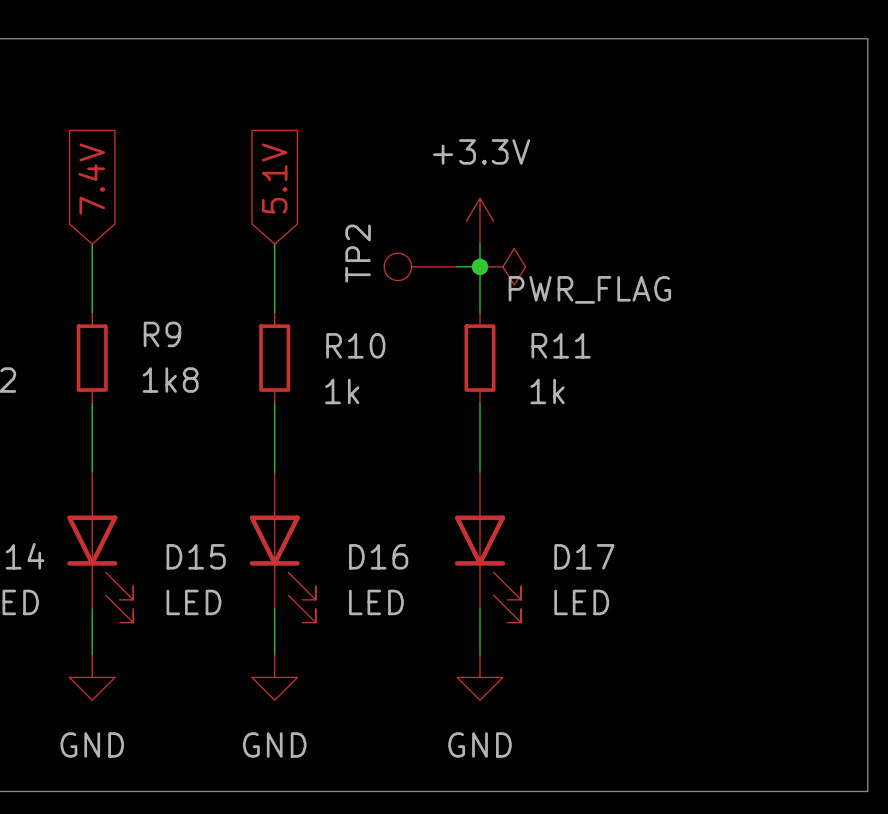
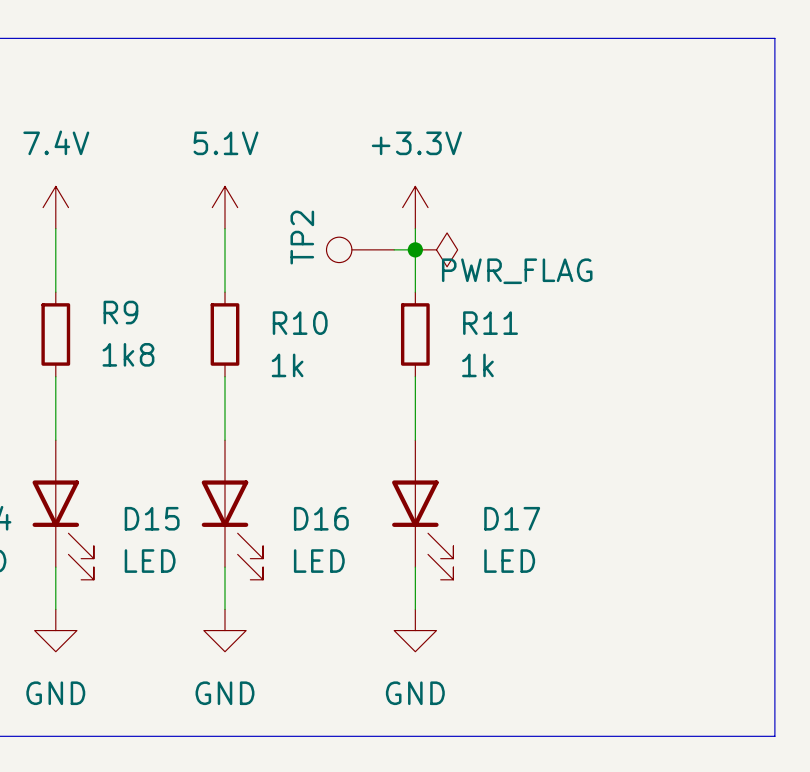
global label: 5.1V (274, 178) -> none
global label: 7.4V (91, 179) -> none
power symbol: none -> 7.4V (55, 207)
power symbol: none -> 5.1V (225, 207)

